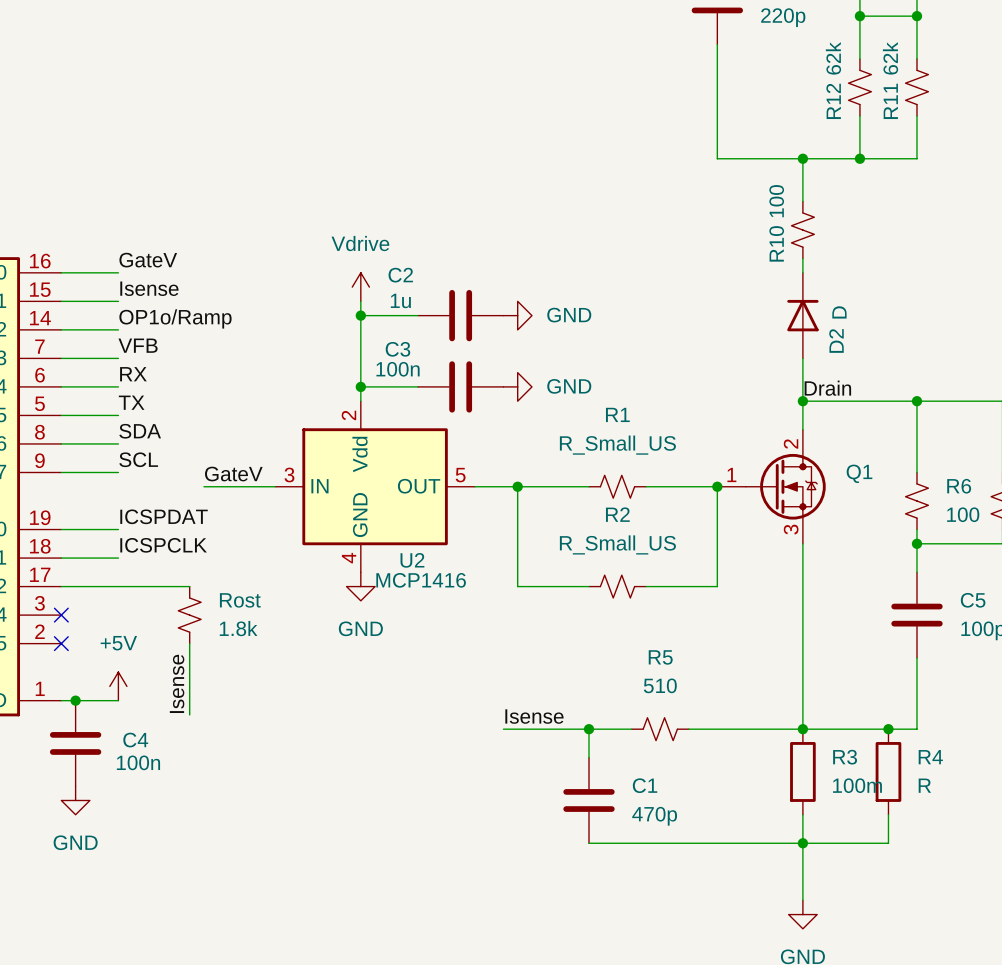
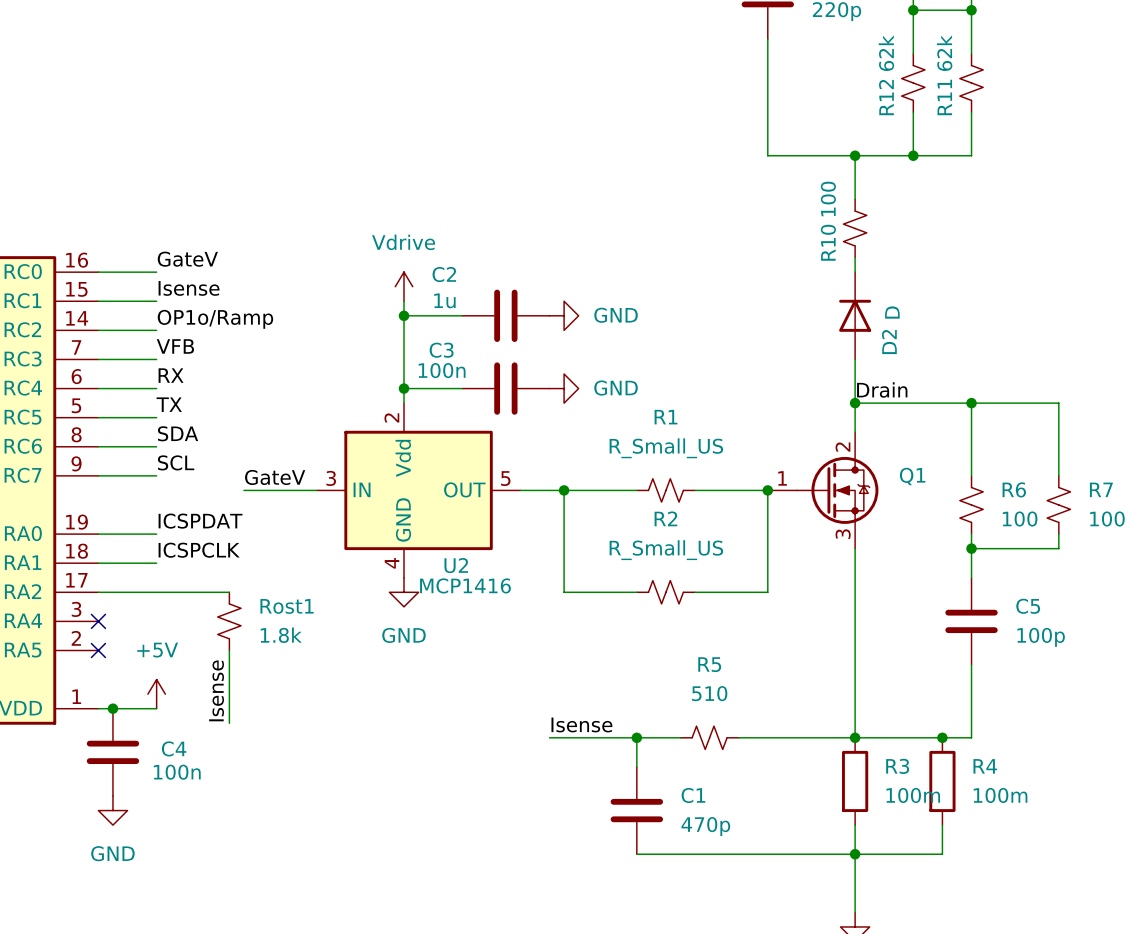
Rost name: Rost (240, 600) -> Rost1 (287, 606)
R4 value: R (924, 785) -> 100m (1000, 795)

